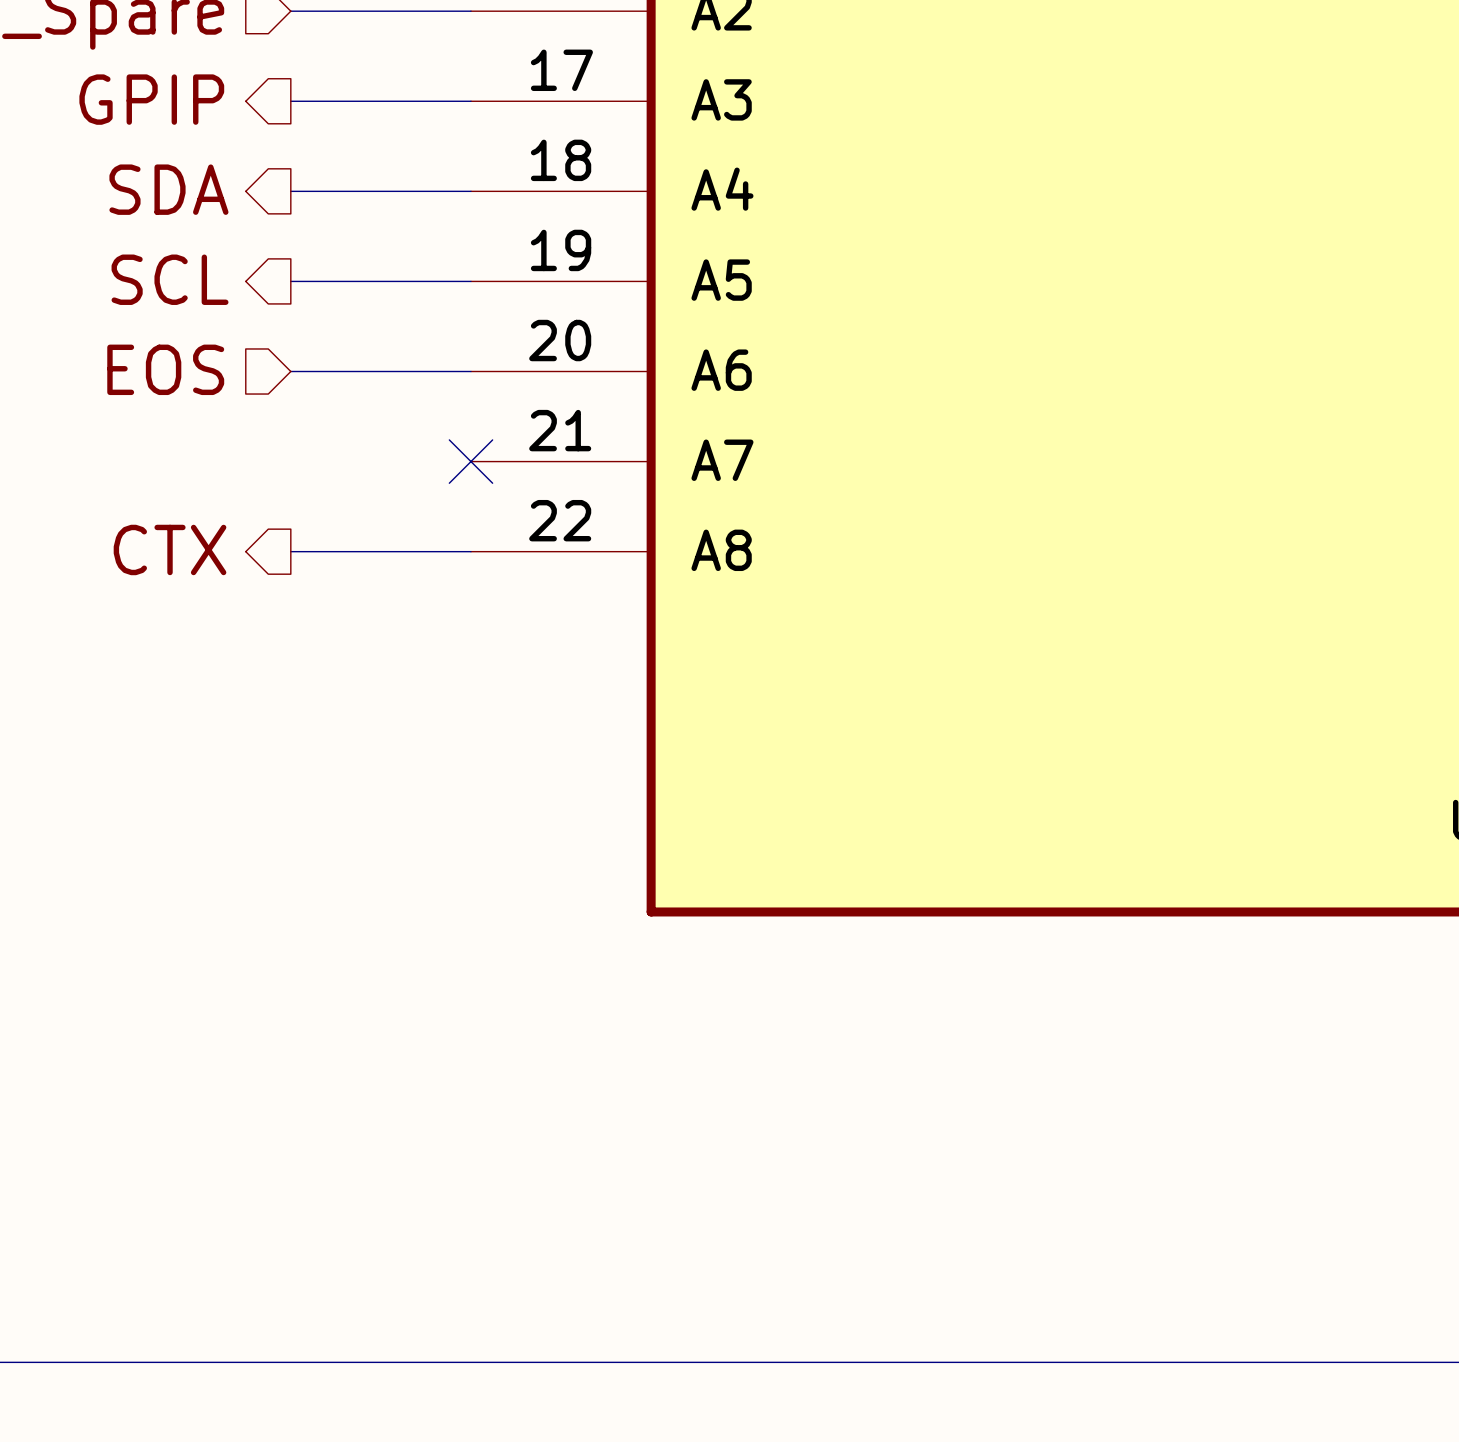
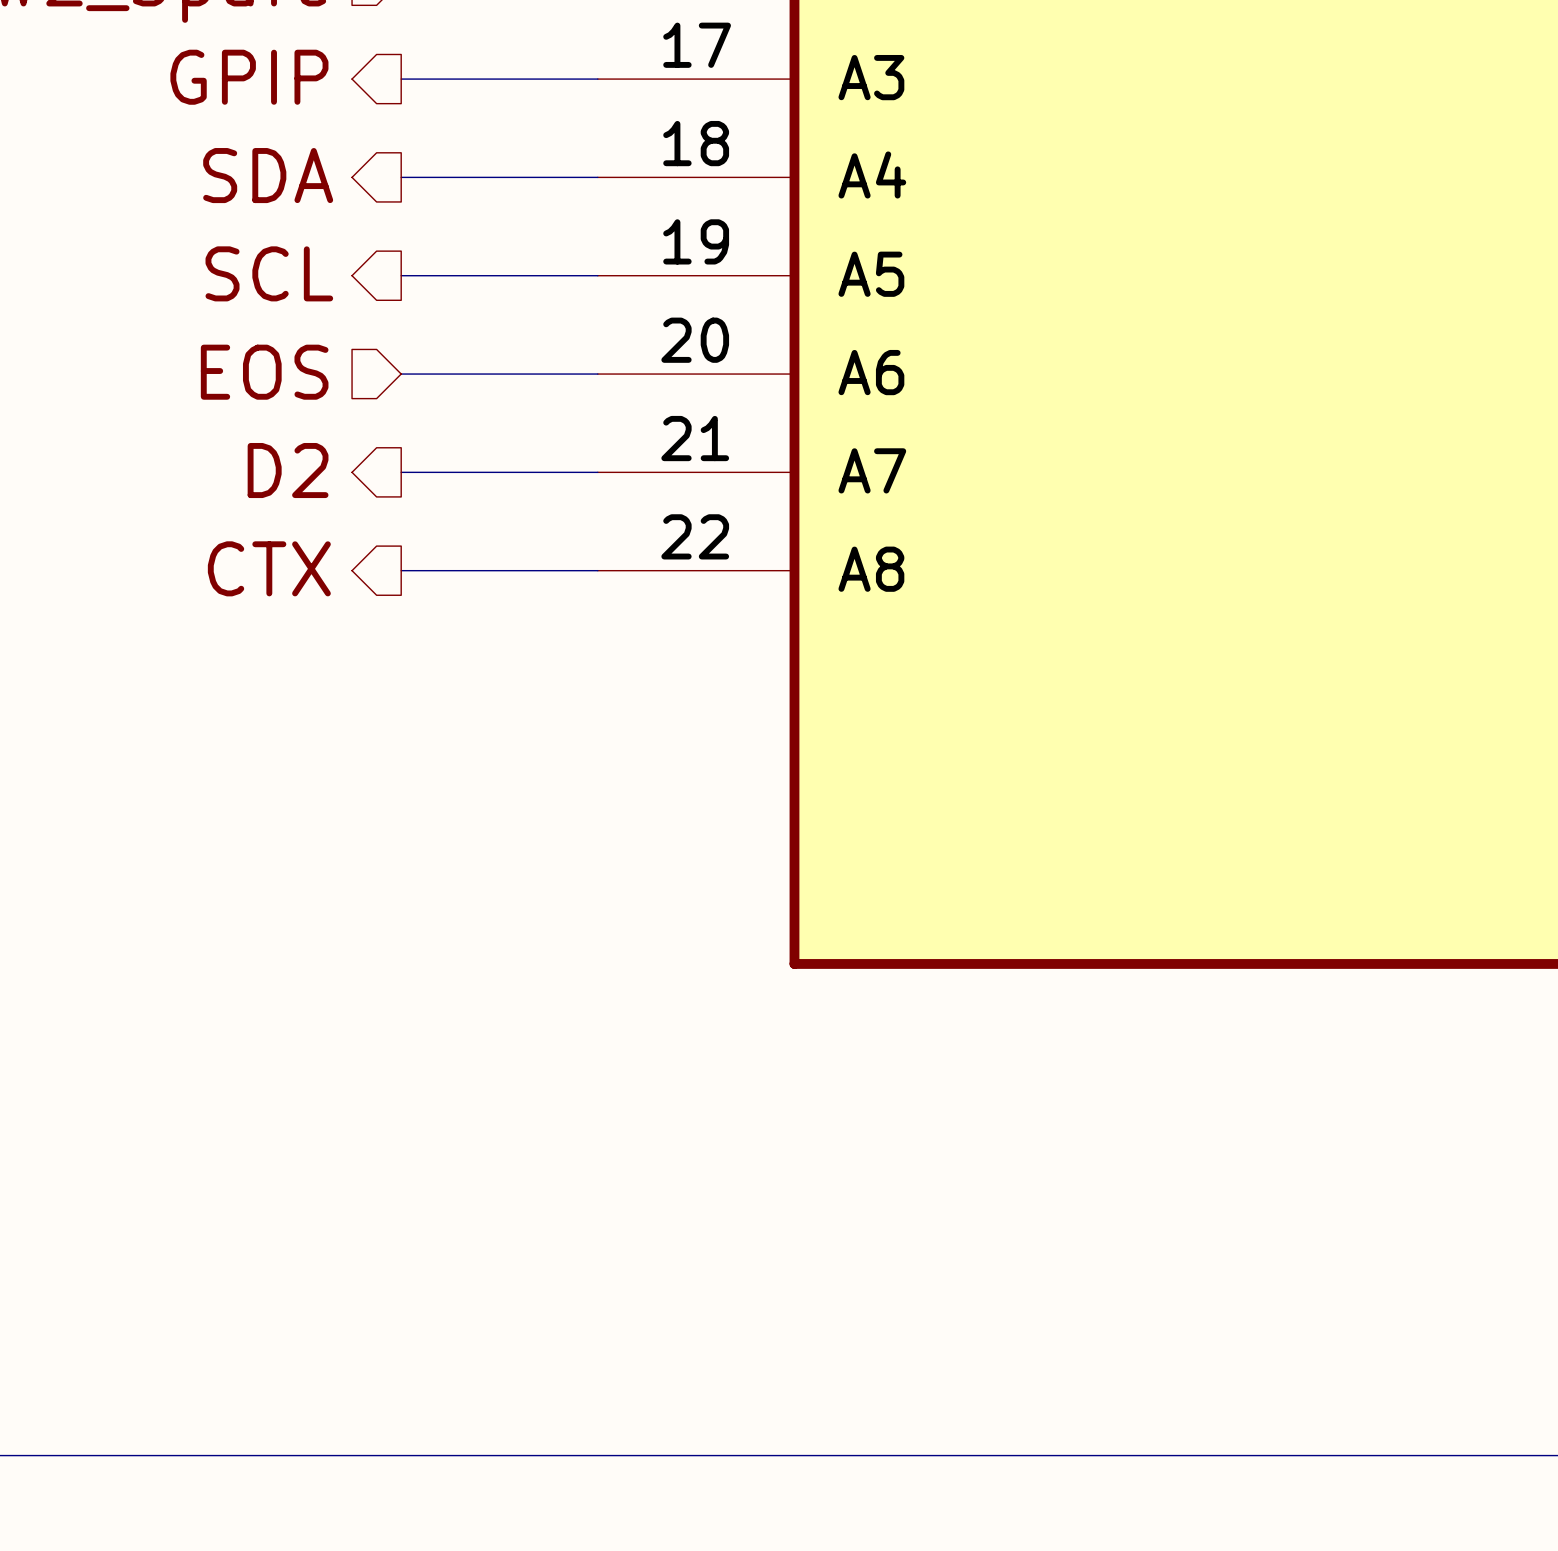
hierarchical label: none -> D2 (288, 470)
wire: none -> (401, 472) (597, 472)
no-connect mark: (470, 461) -> none

